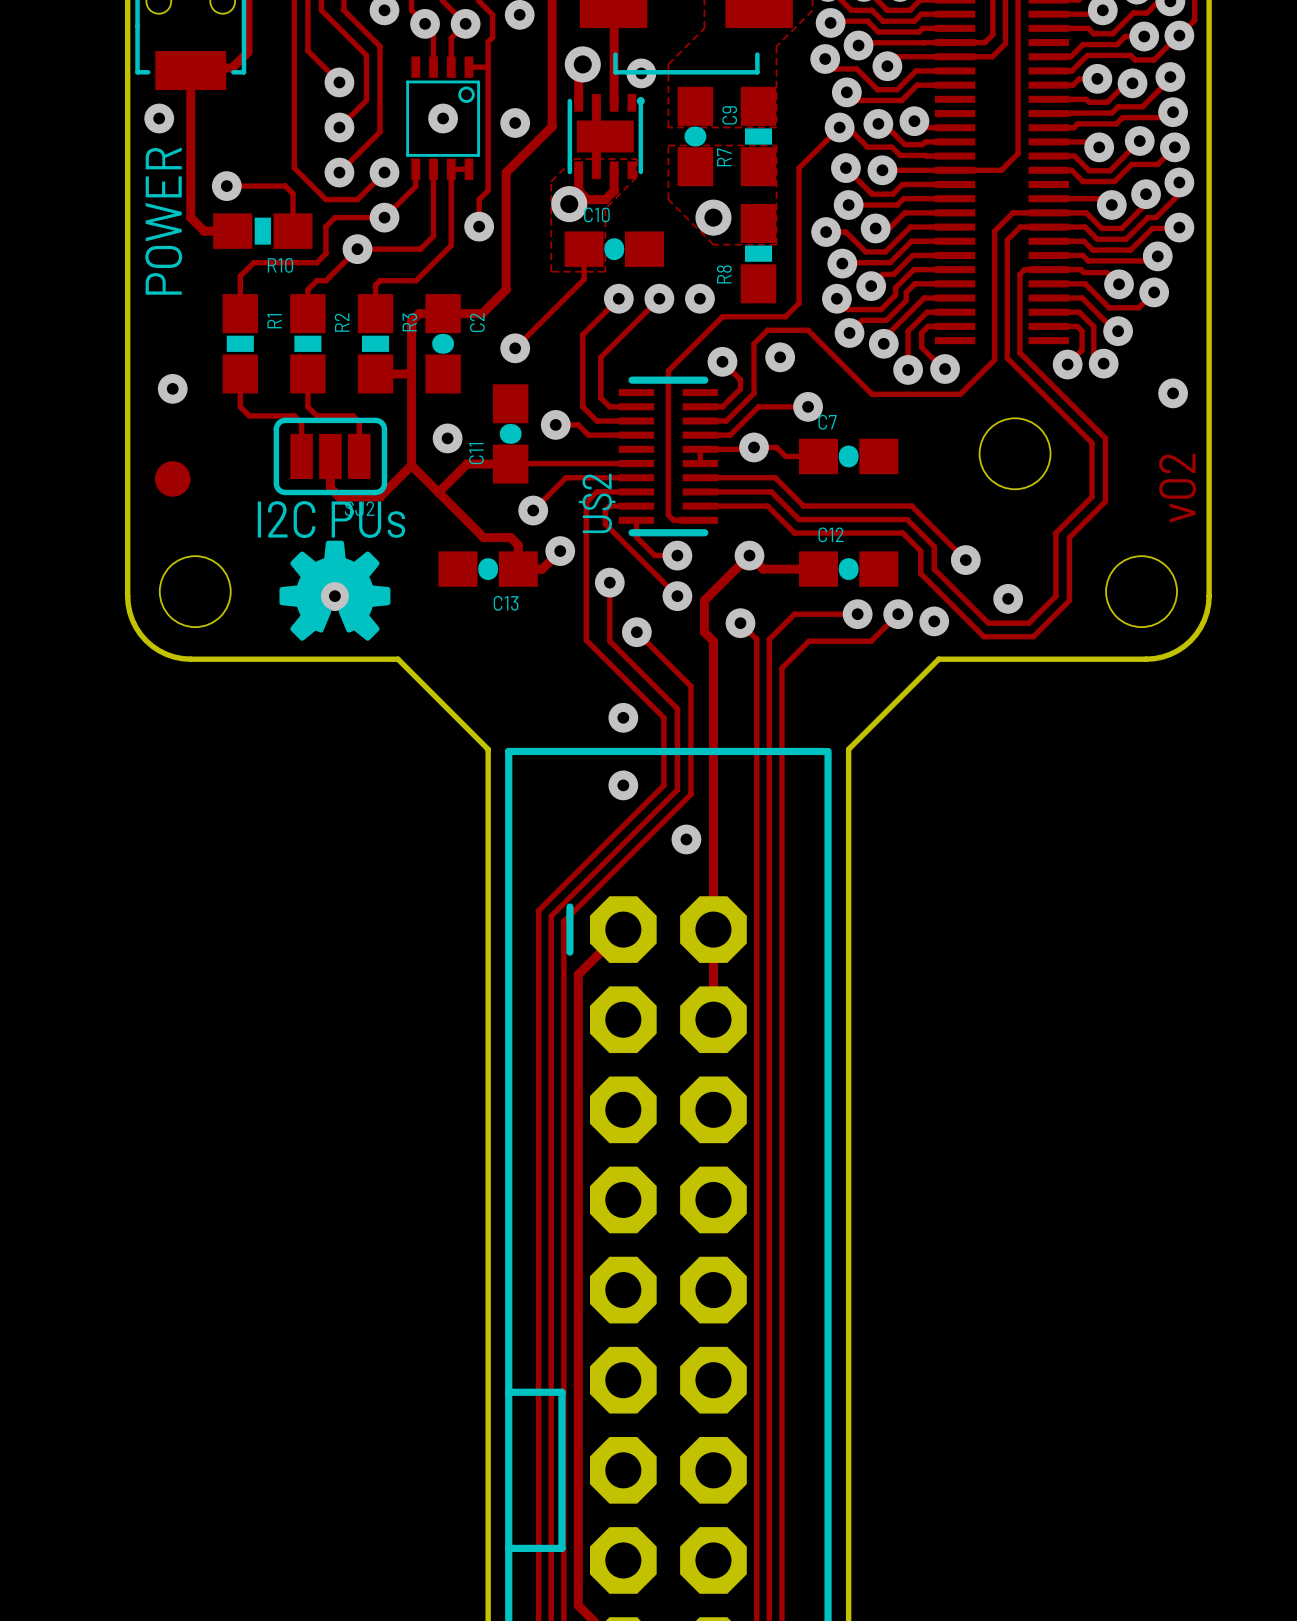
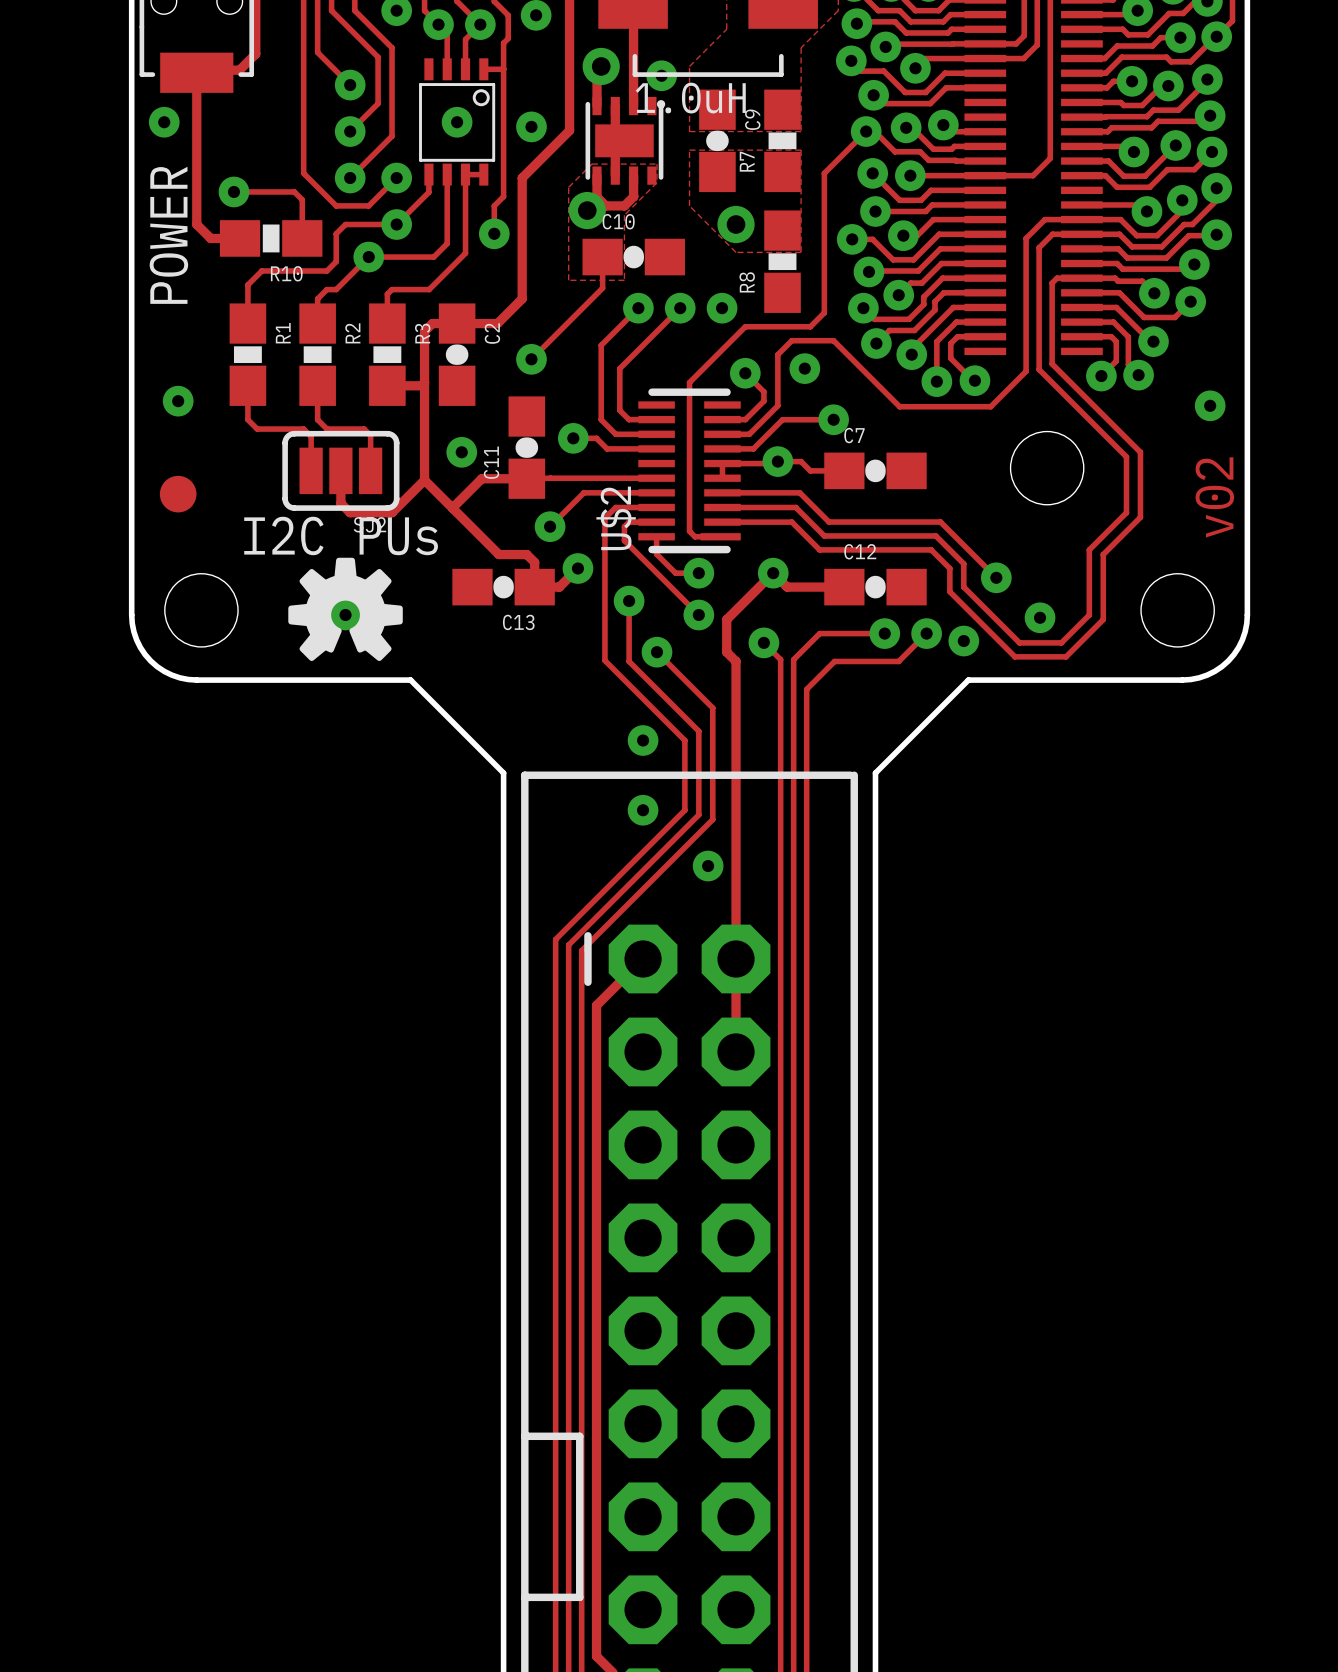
part value: none -> 1.0uH (690, 98)

